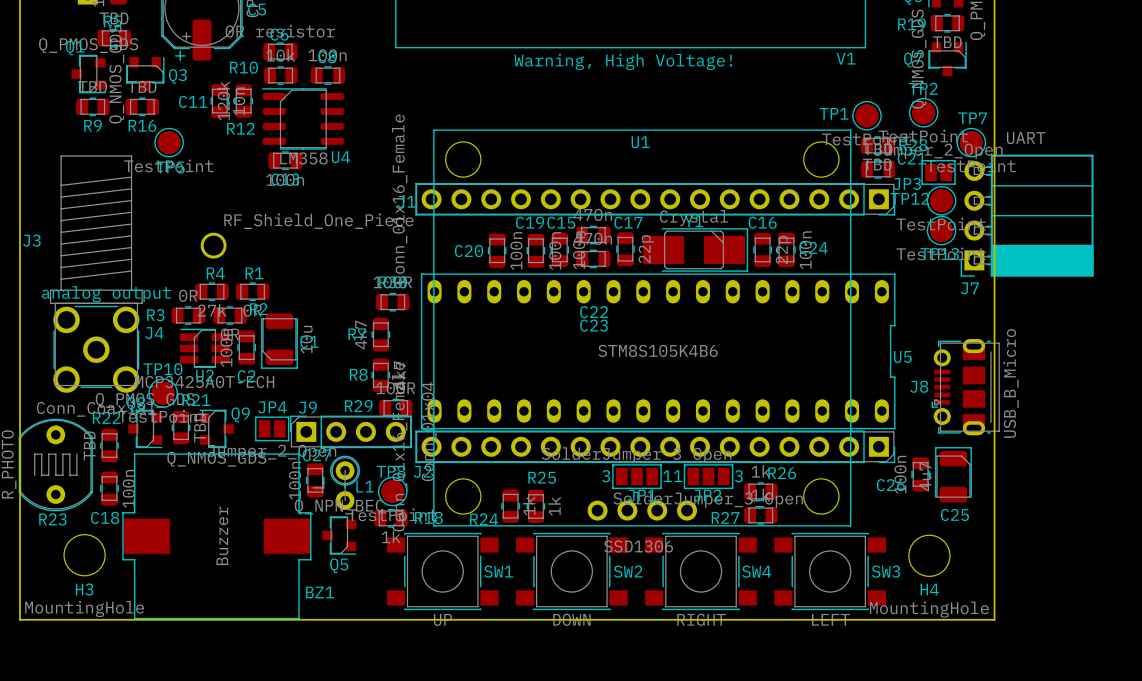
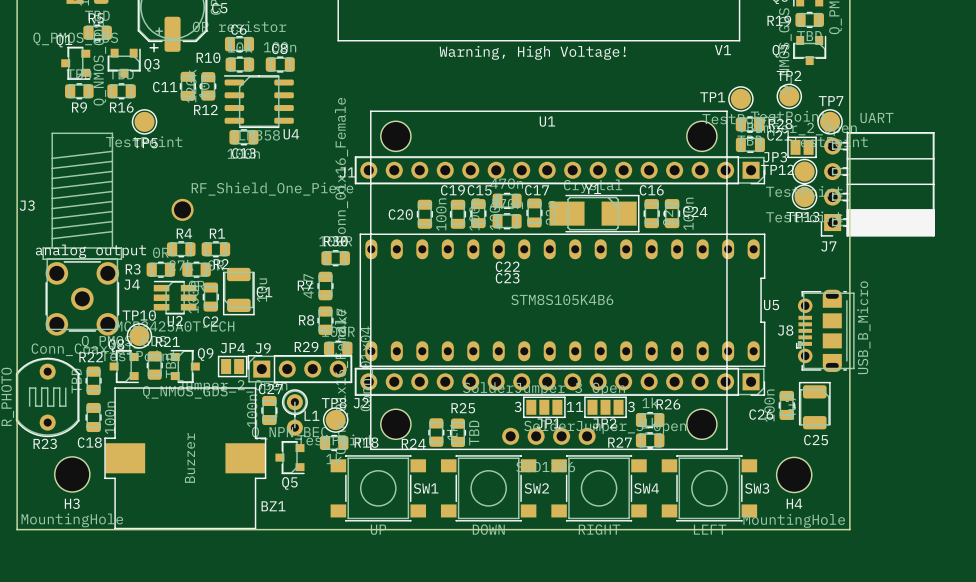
R25 value: 1k (554, 506) -> TBD (474, 433)

